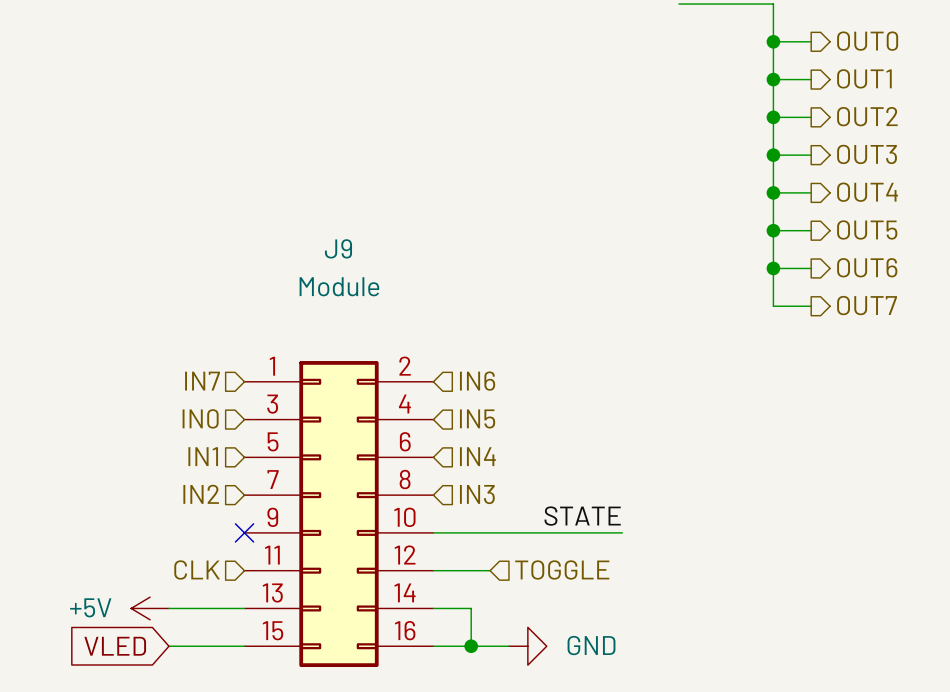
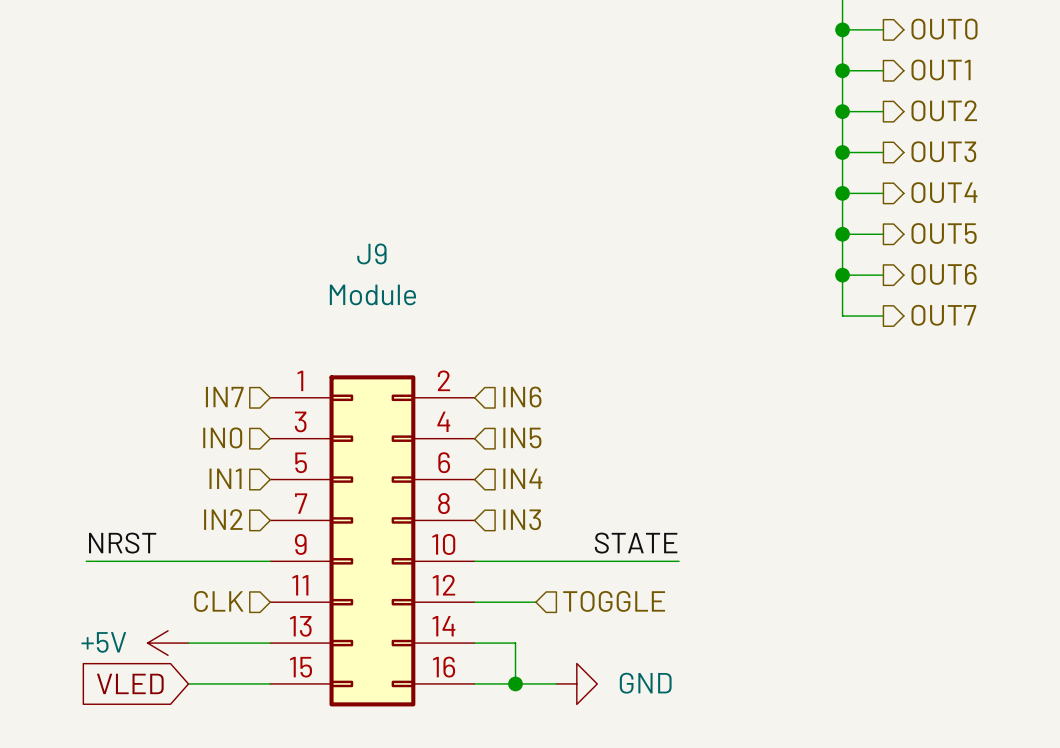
label: none -> NRST (122, 543)
wire: none -> (86, 561) (270, 561)
no-connect mark: (244, 532) -> none

